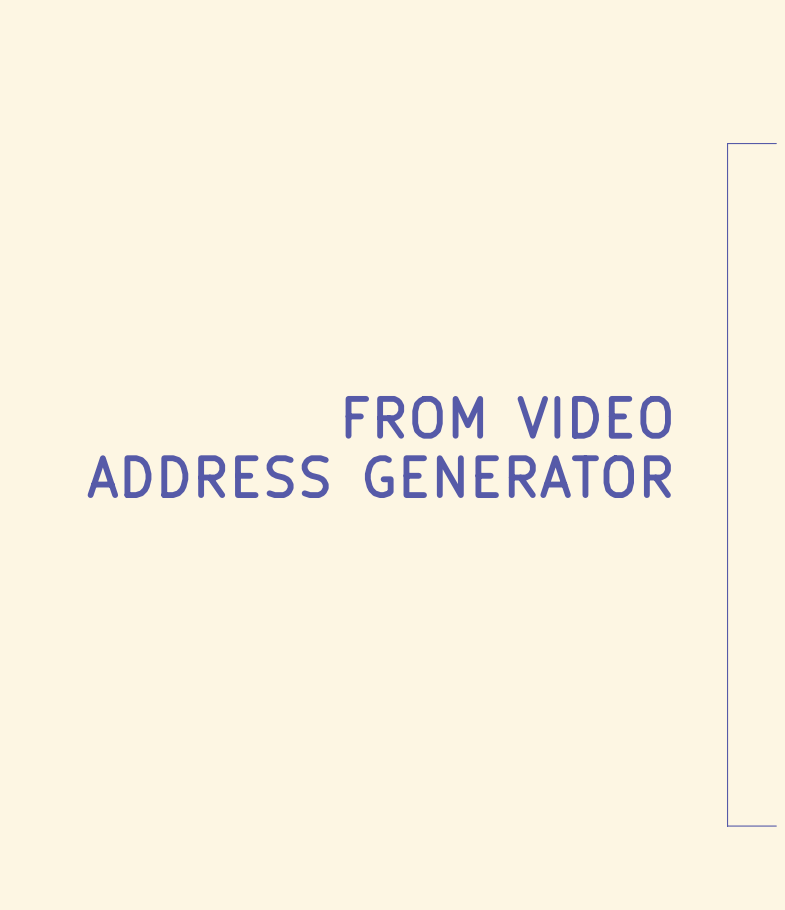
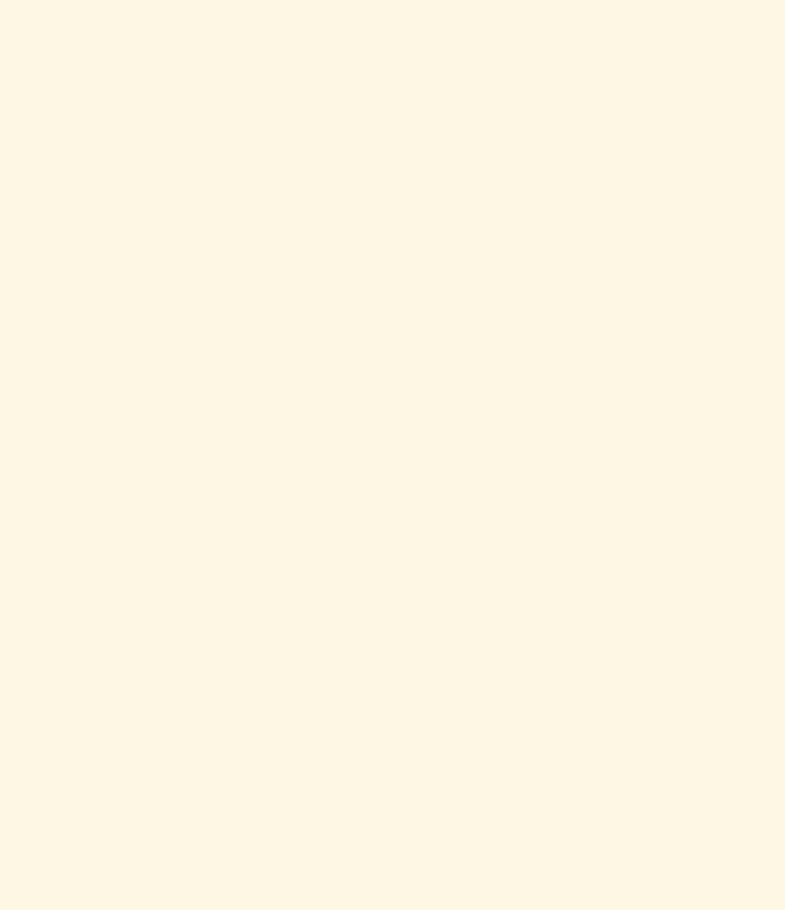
line: (776, 143) (727, 143) (727, 826) (776, 826) -> none
text: FROM VIDEO (508, 417) -> none
text: ADDRESS GENERATOR (379, 476) -> none

